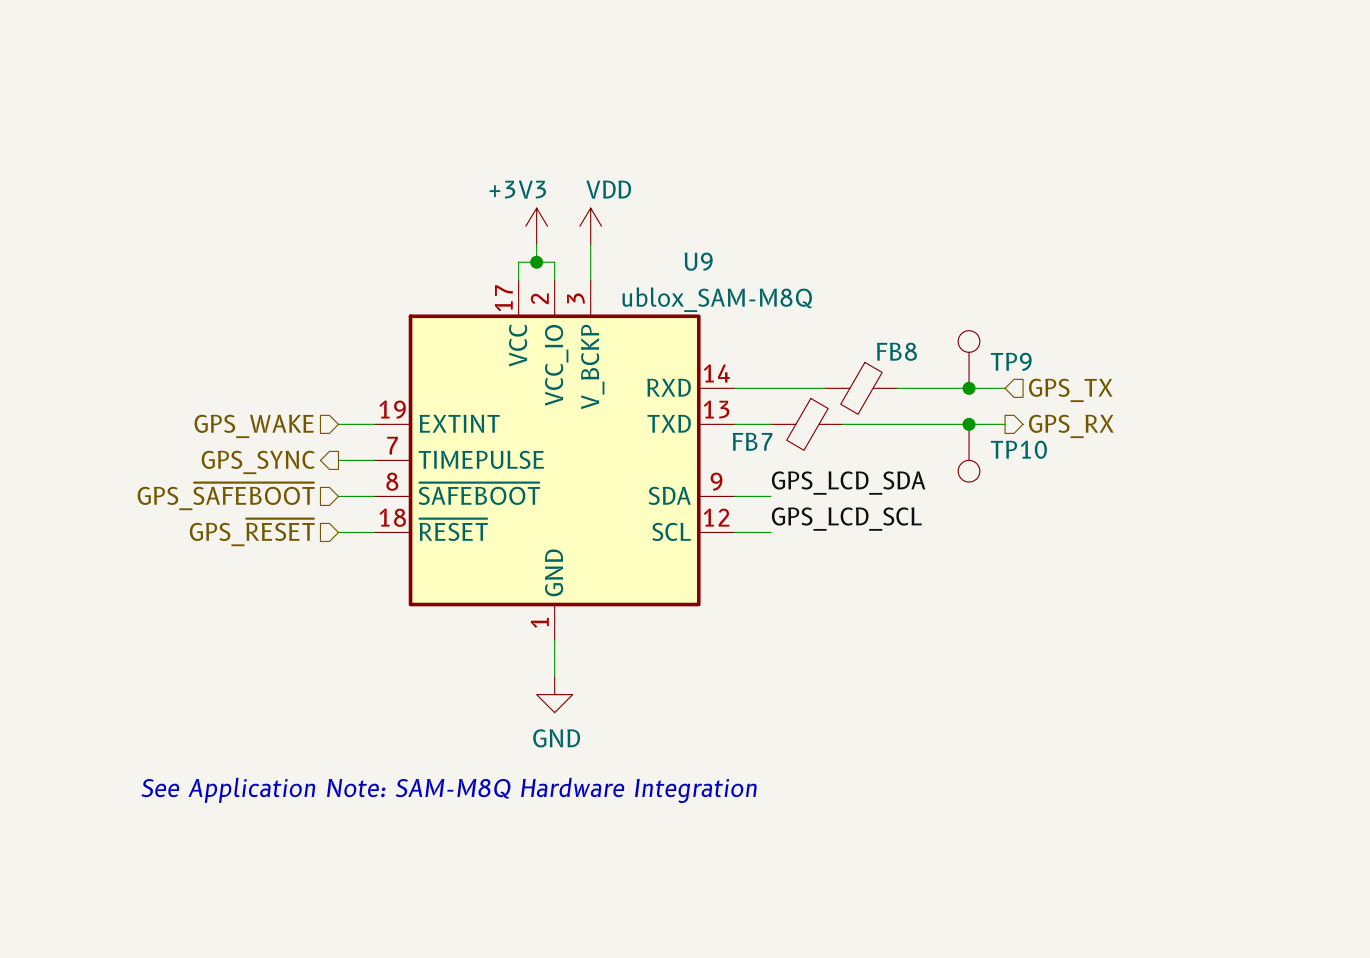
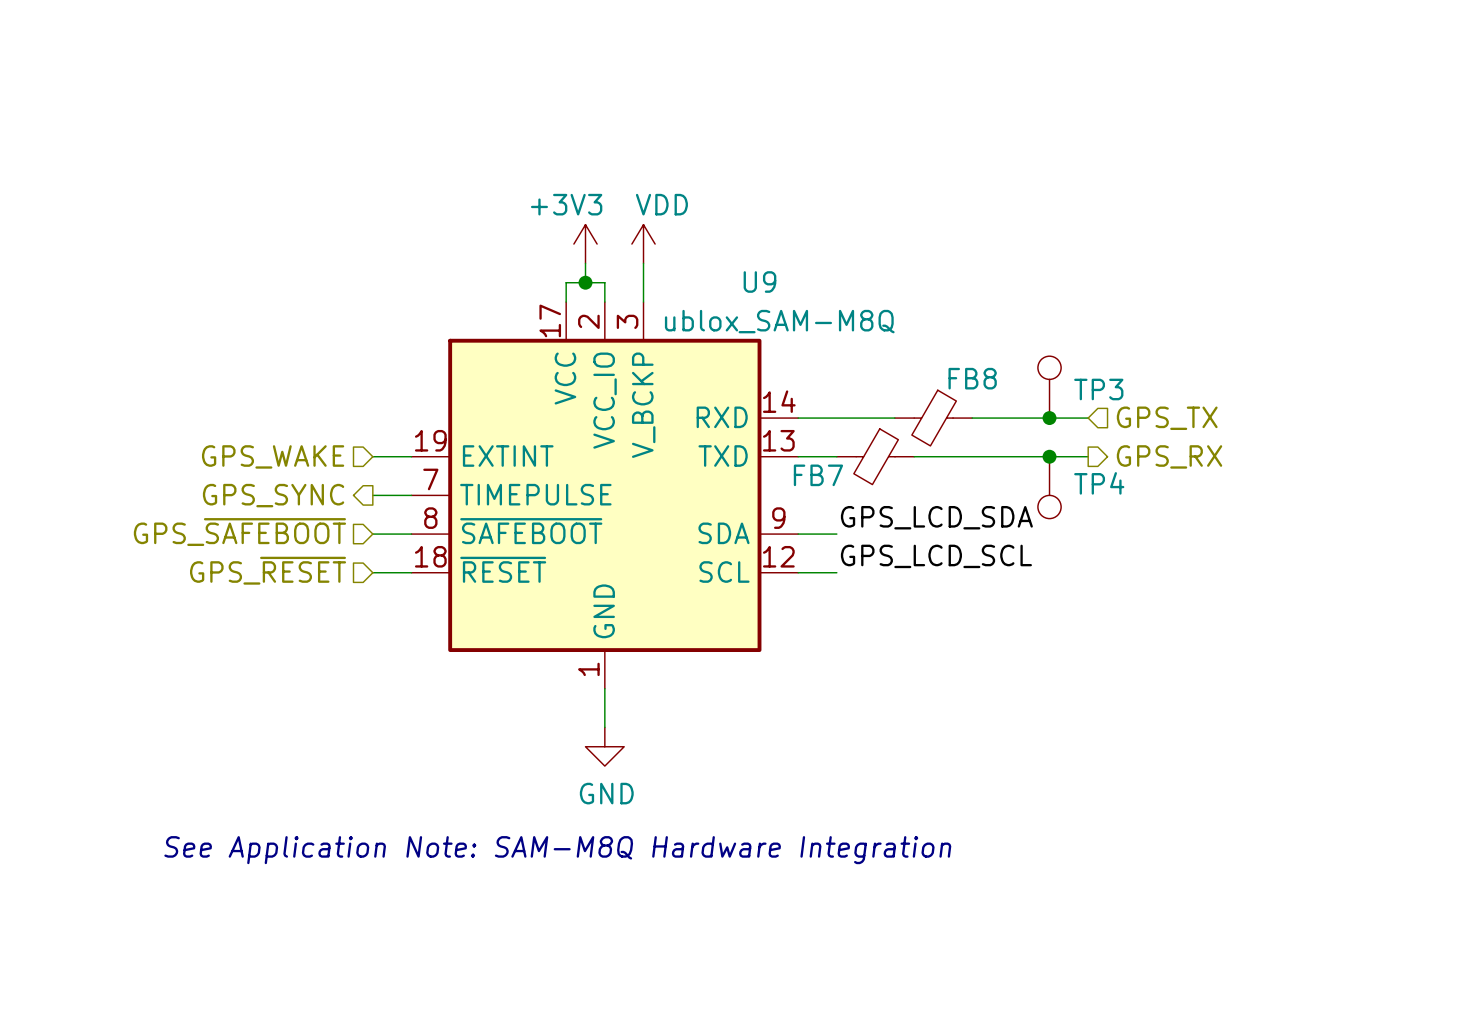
TP9 name: TP9 (1011, 361) -> TP3 (1098, 389)
TP10 name: TP10 (1018, 449) -> TP4 (1099, 483)

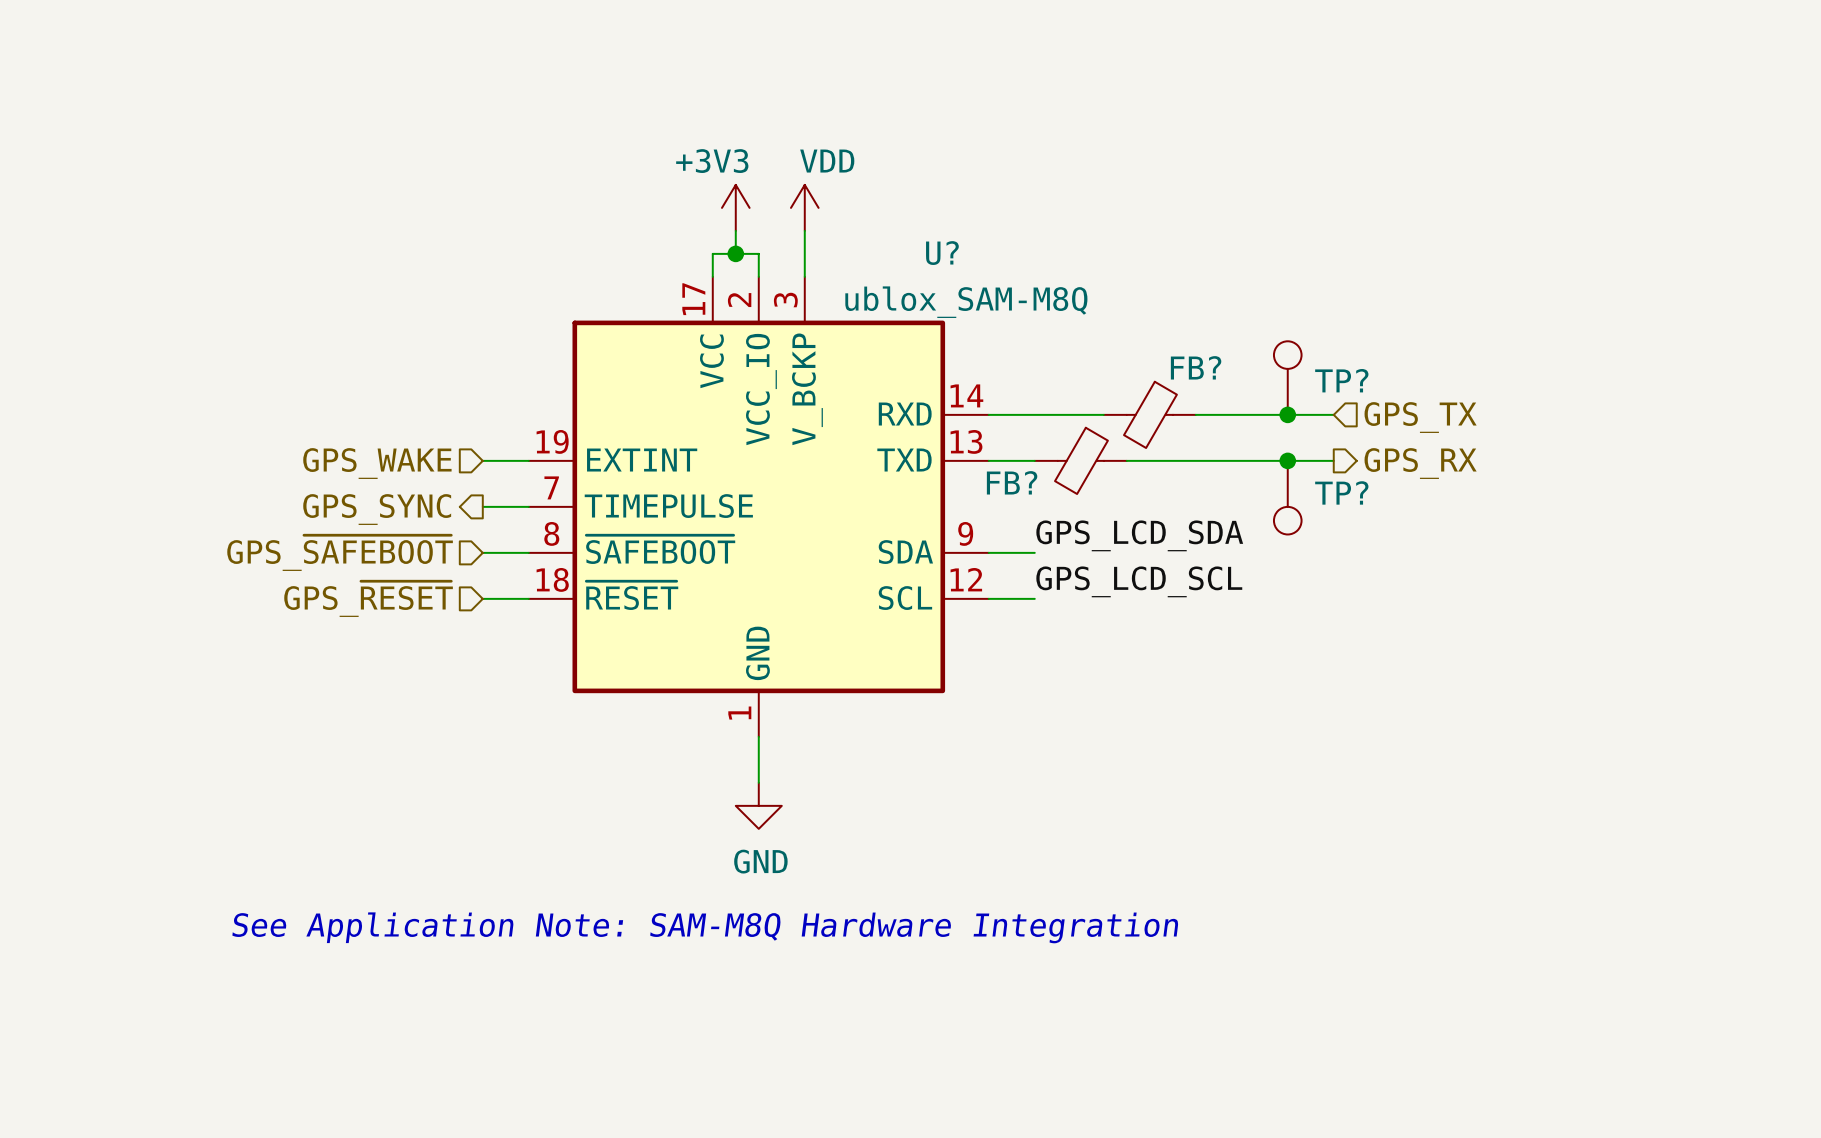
U9 name: U9 (759, 282) -> U? (942, 253)
FB8 name: FB8 (972, 378) -> FB? (1196, 367)
TP3 name: TP3 (1098, 389) -> TP? (1341, 380)
FB7 name: FB7 (818, 475) -> FB? (1012, 482)
TP4 name: TP4 (1099, 483) -> TP? (1341, 492)

